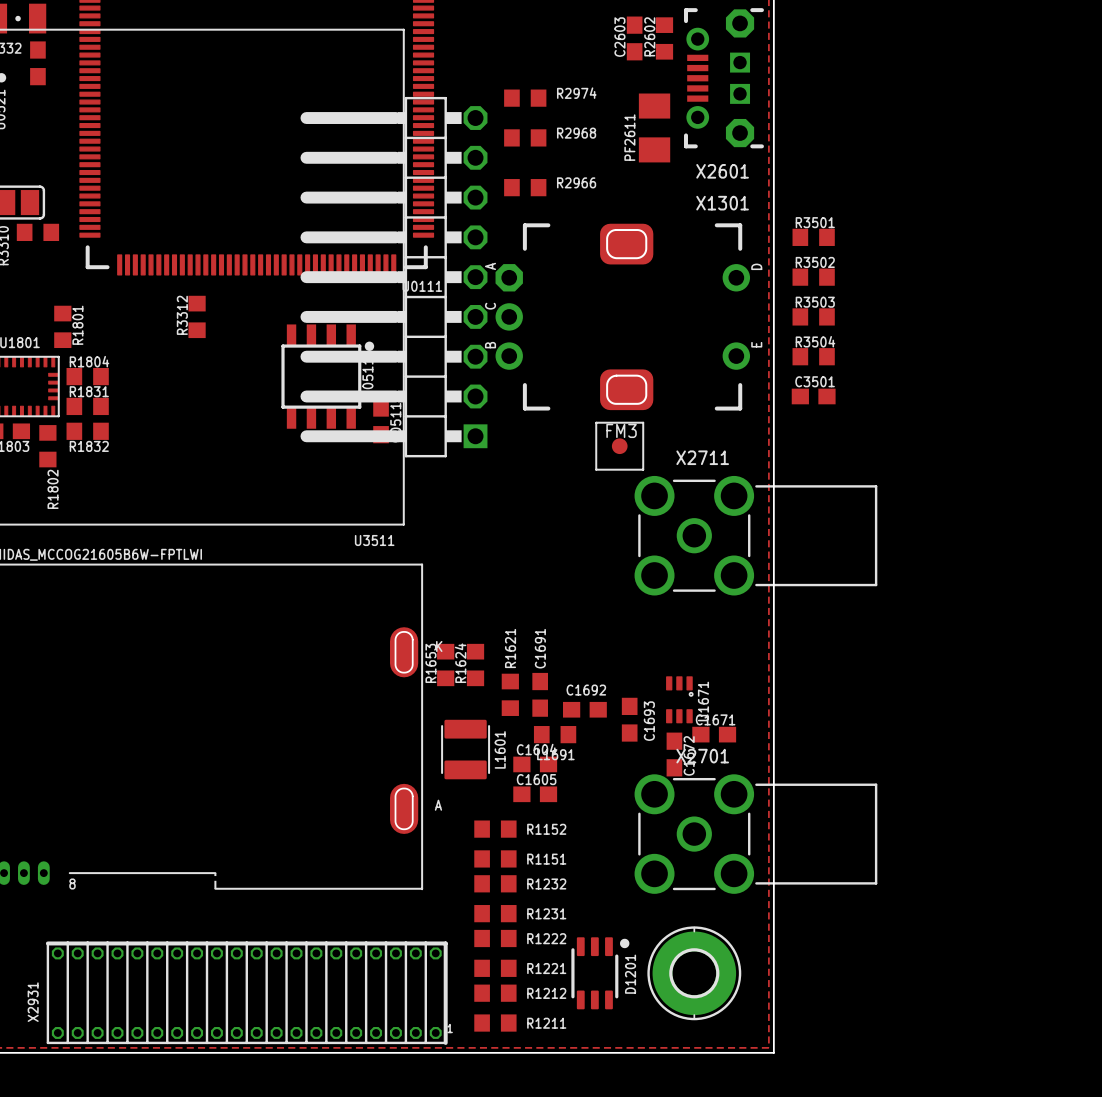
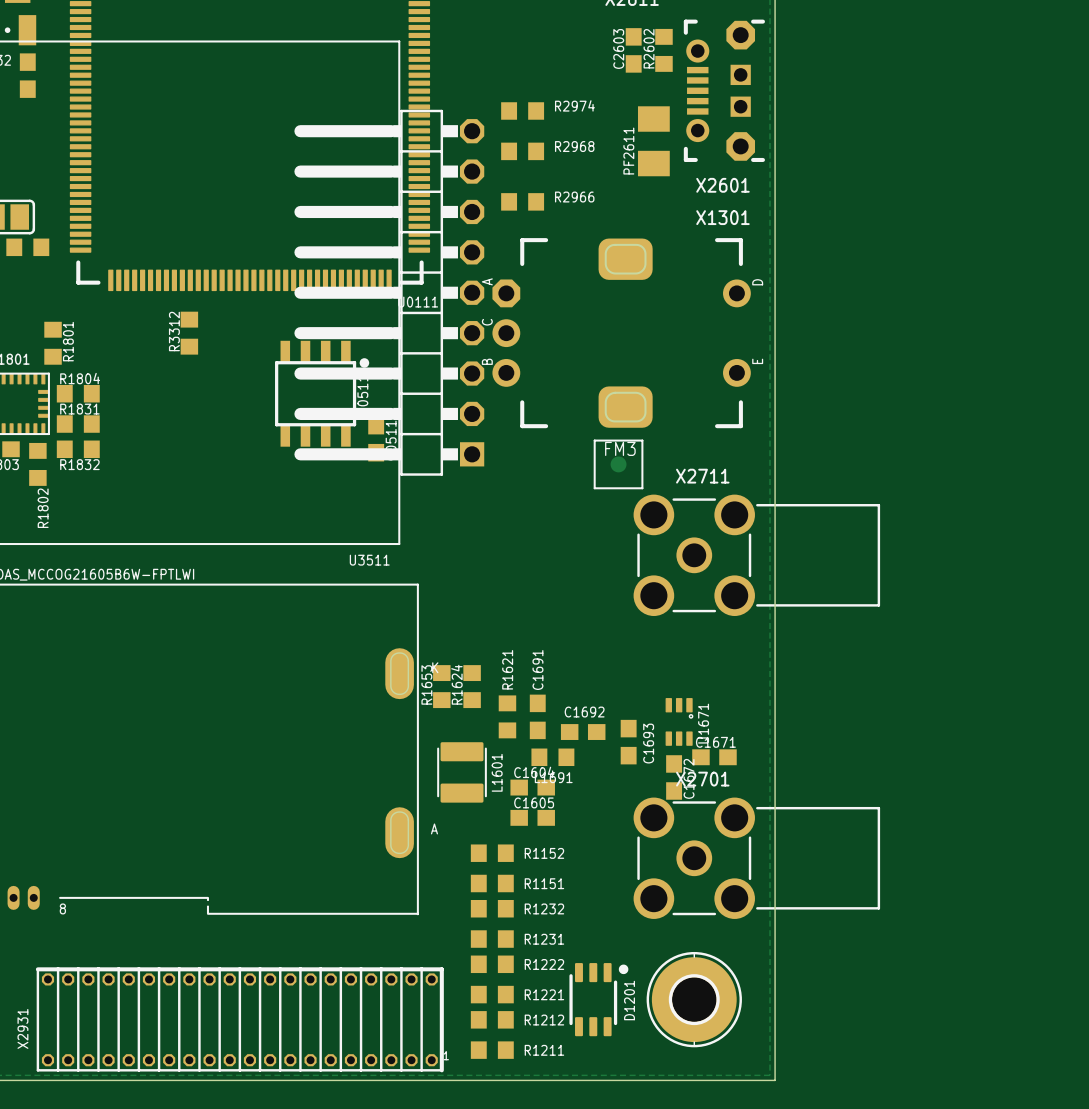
R3501: (813, 237) -> none
R3502: (813, 277) -> none
R3503: (813, 316) -> none
R3504: (813, 356) -> none
C3501: (813, 396) -> none

